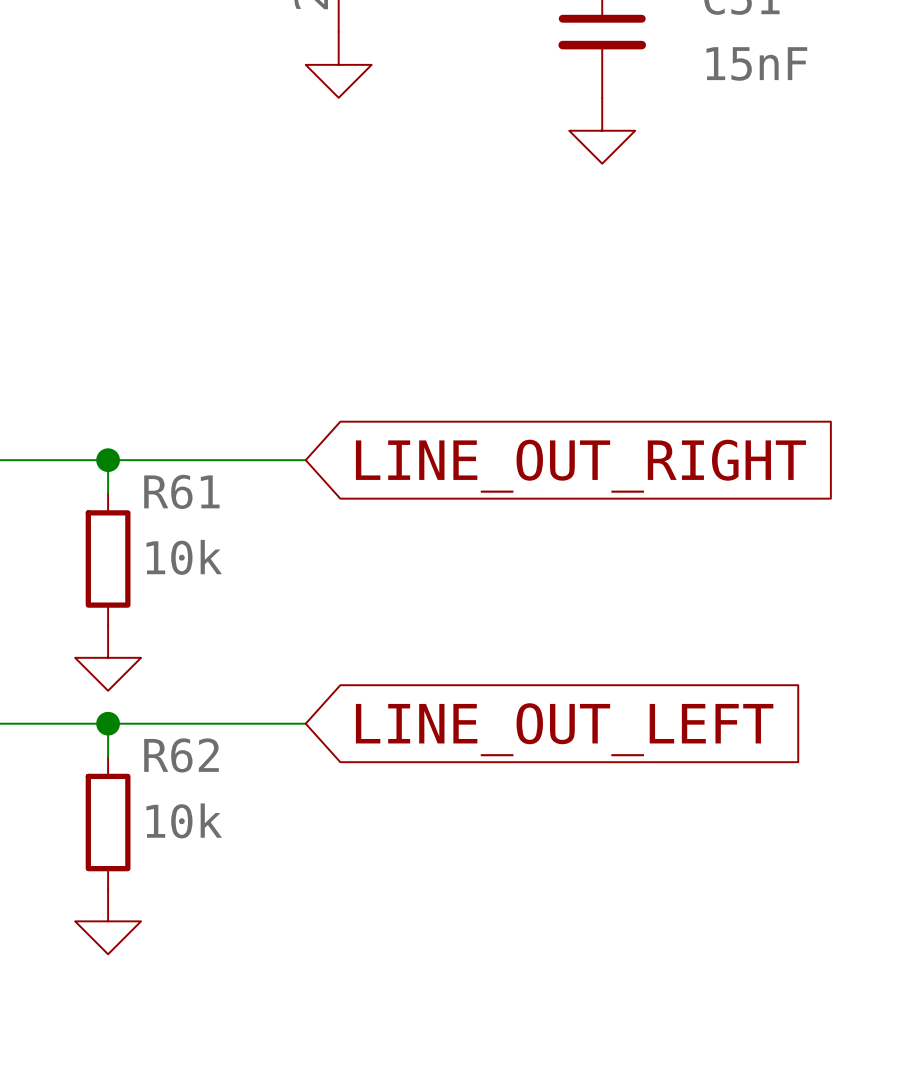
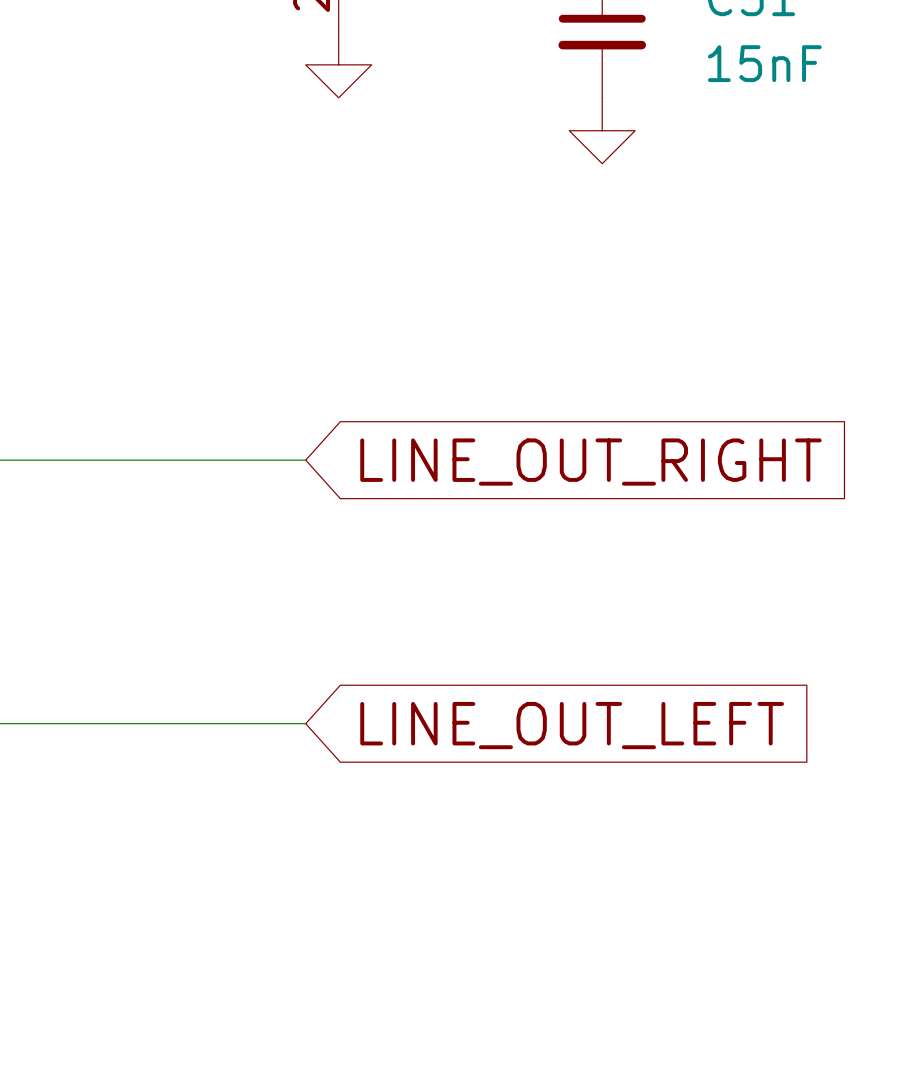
wire: (108, 460) (108, 493) -> none
junction: (108, 460) -> none
R61: 10k (108, 558) -> none
power symbol: (108, 657) -> none
wire: (108, 723) (108, 756) -> none
junction: (108, 723) -> none
R62: 10k (108, 822) -> none
power symbol: (108, 921) -> none

